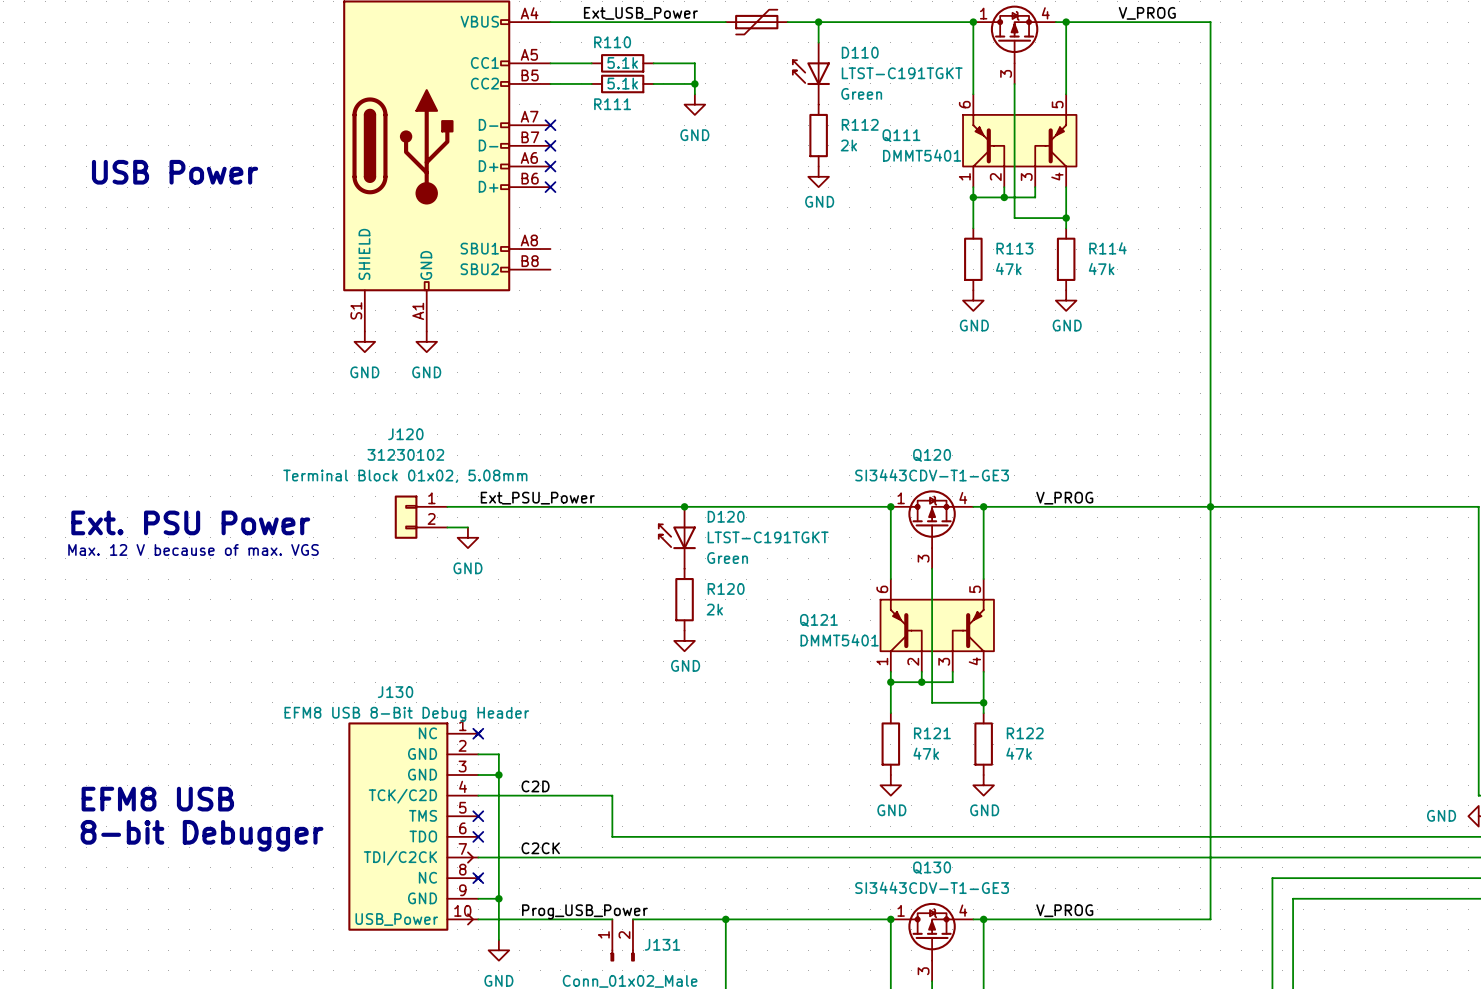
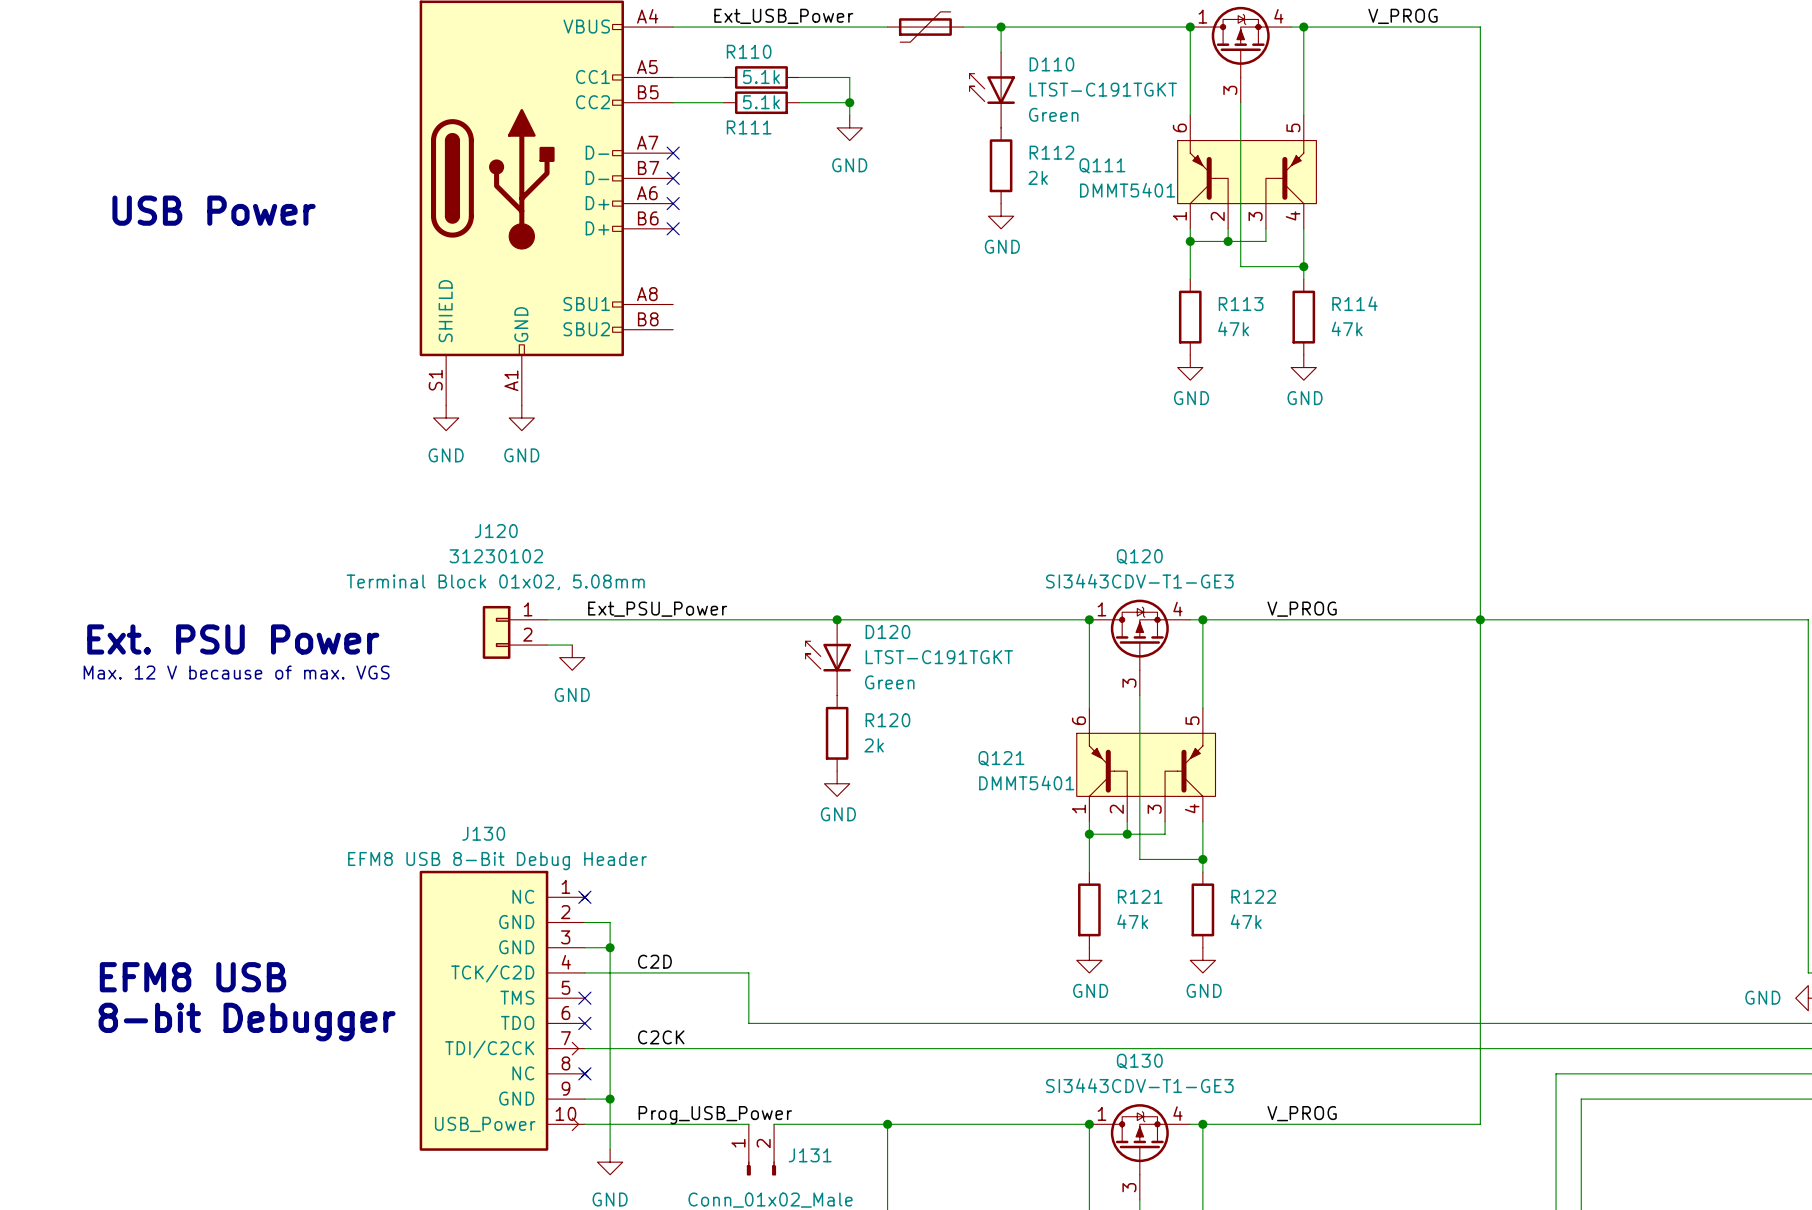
J130 symbol: [348, 722, 481, 931] -> [419, 870, 588, 1151]

